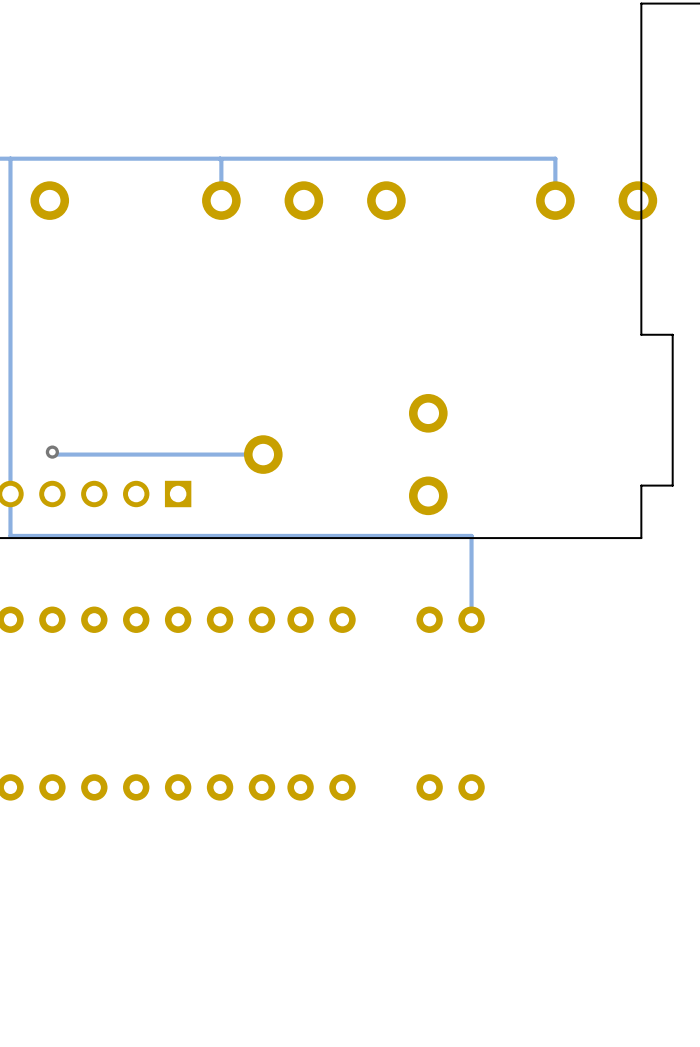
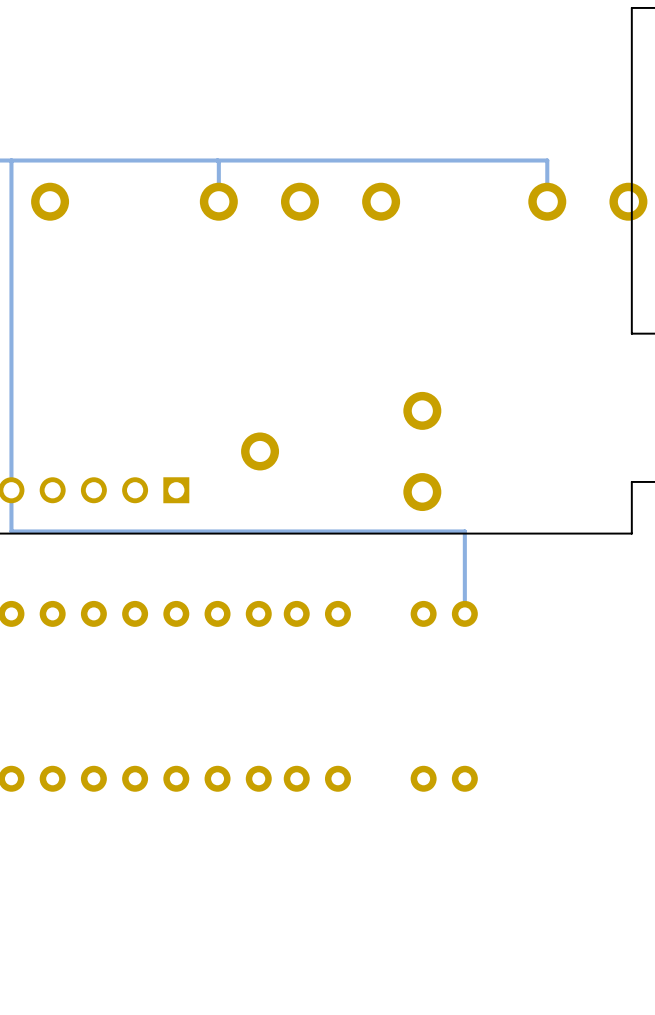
track: (52, 452) (54, 454) (263, 454) -> none
via: (52, 452) -> none

